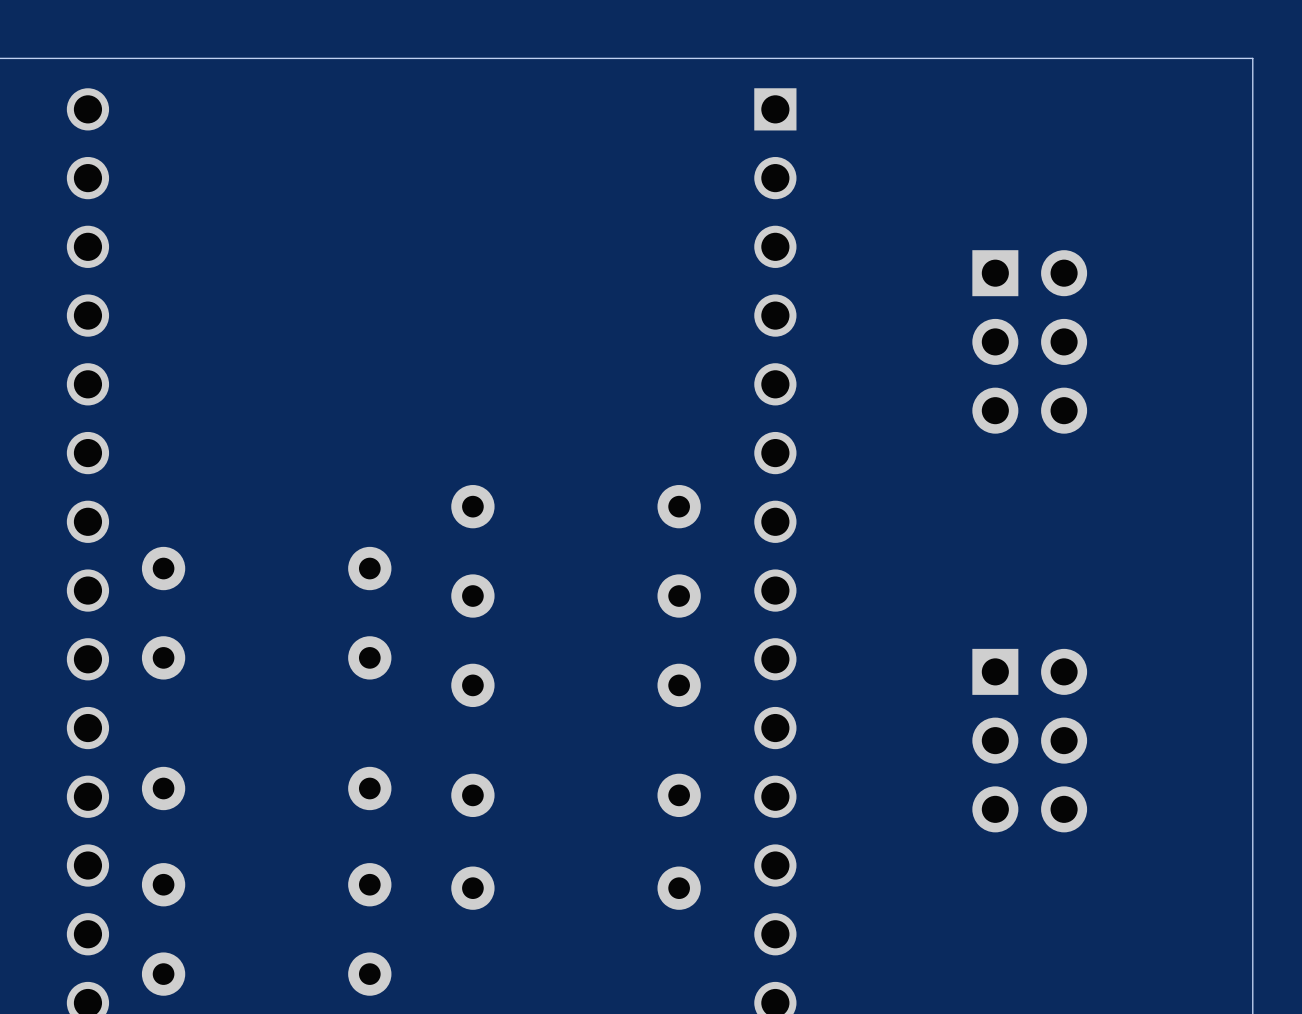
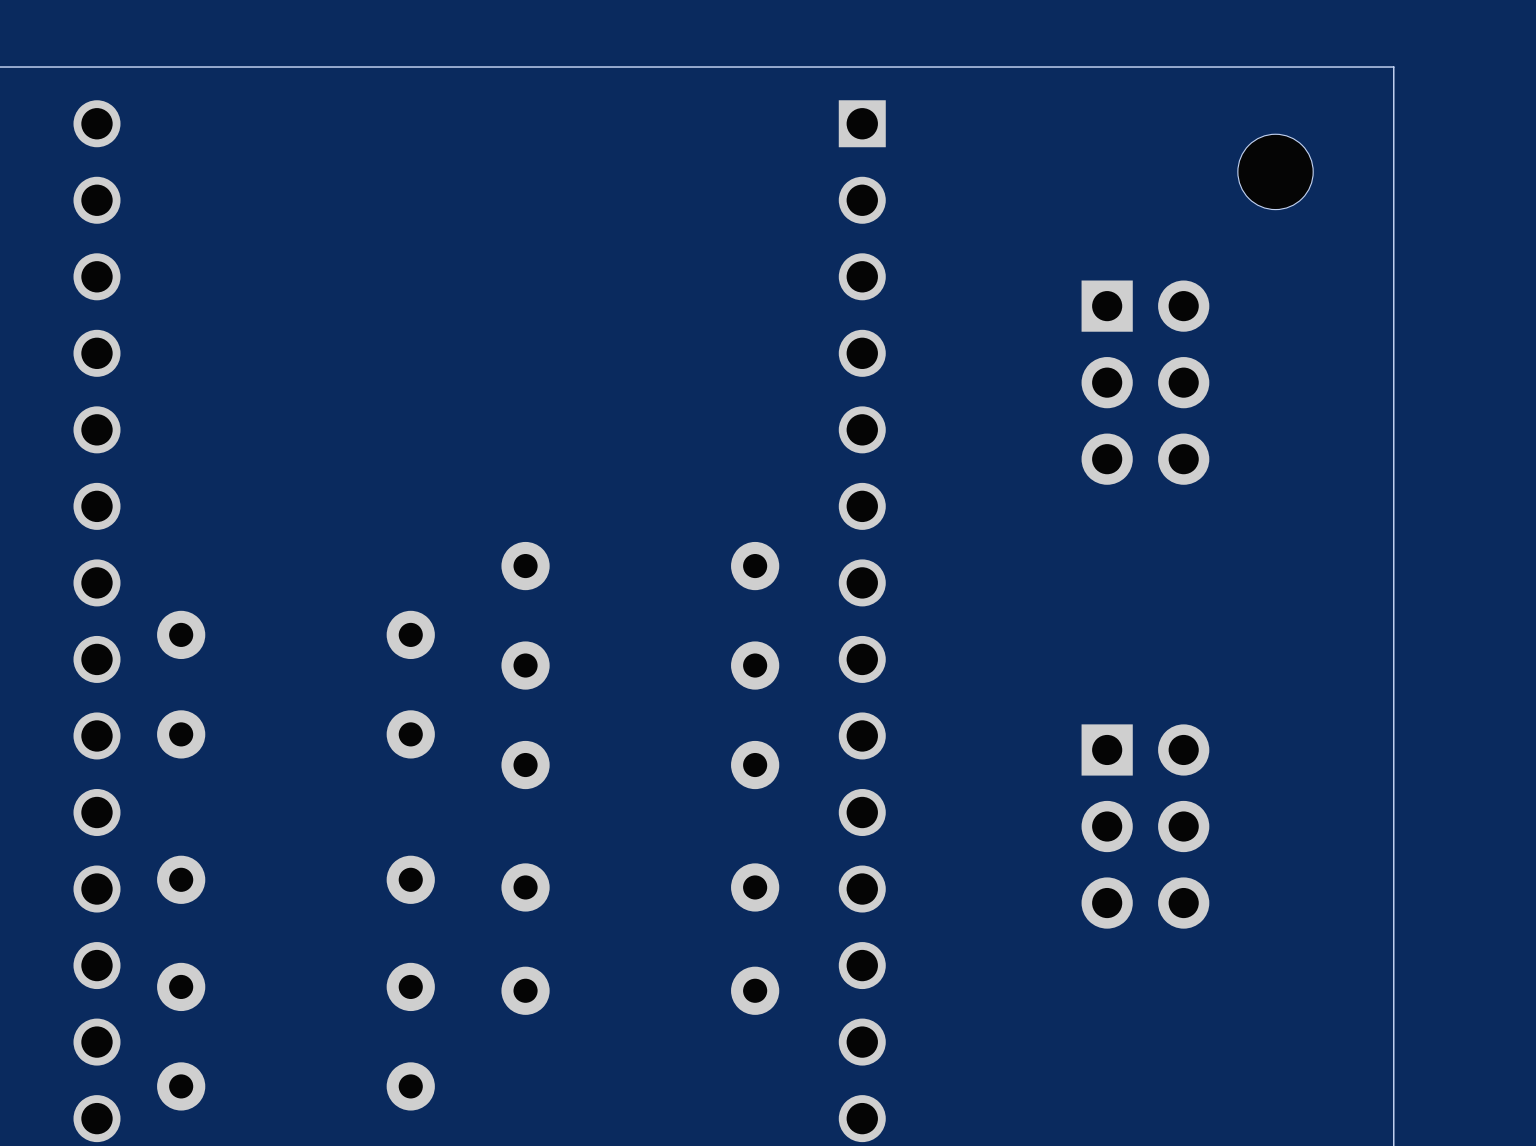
part: none -> (1275, 171)

